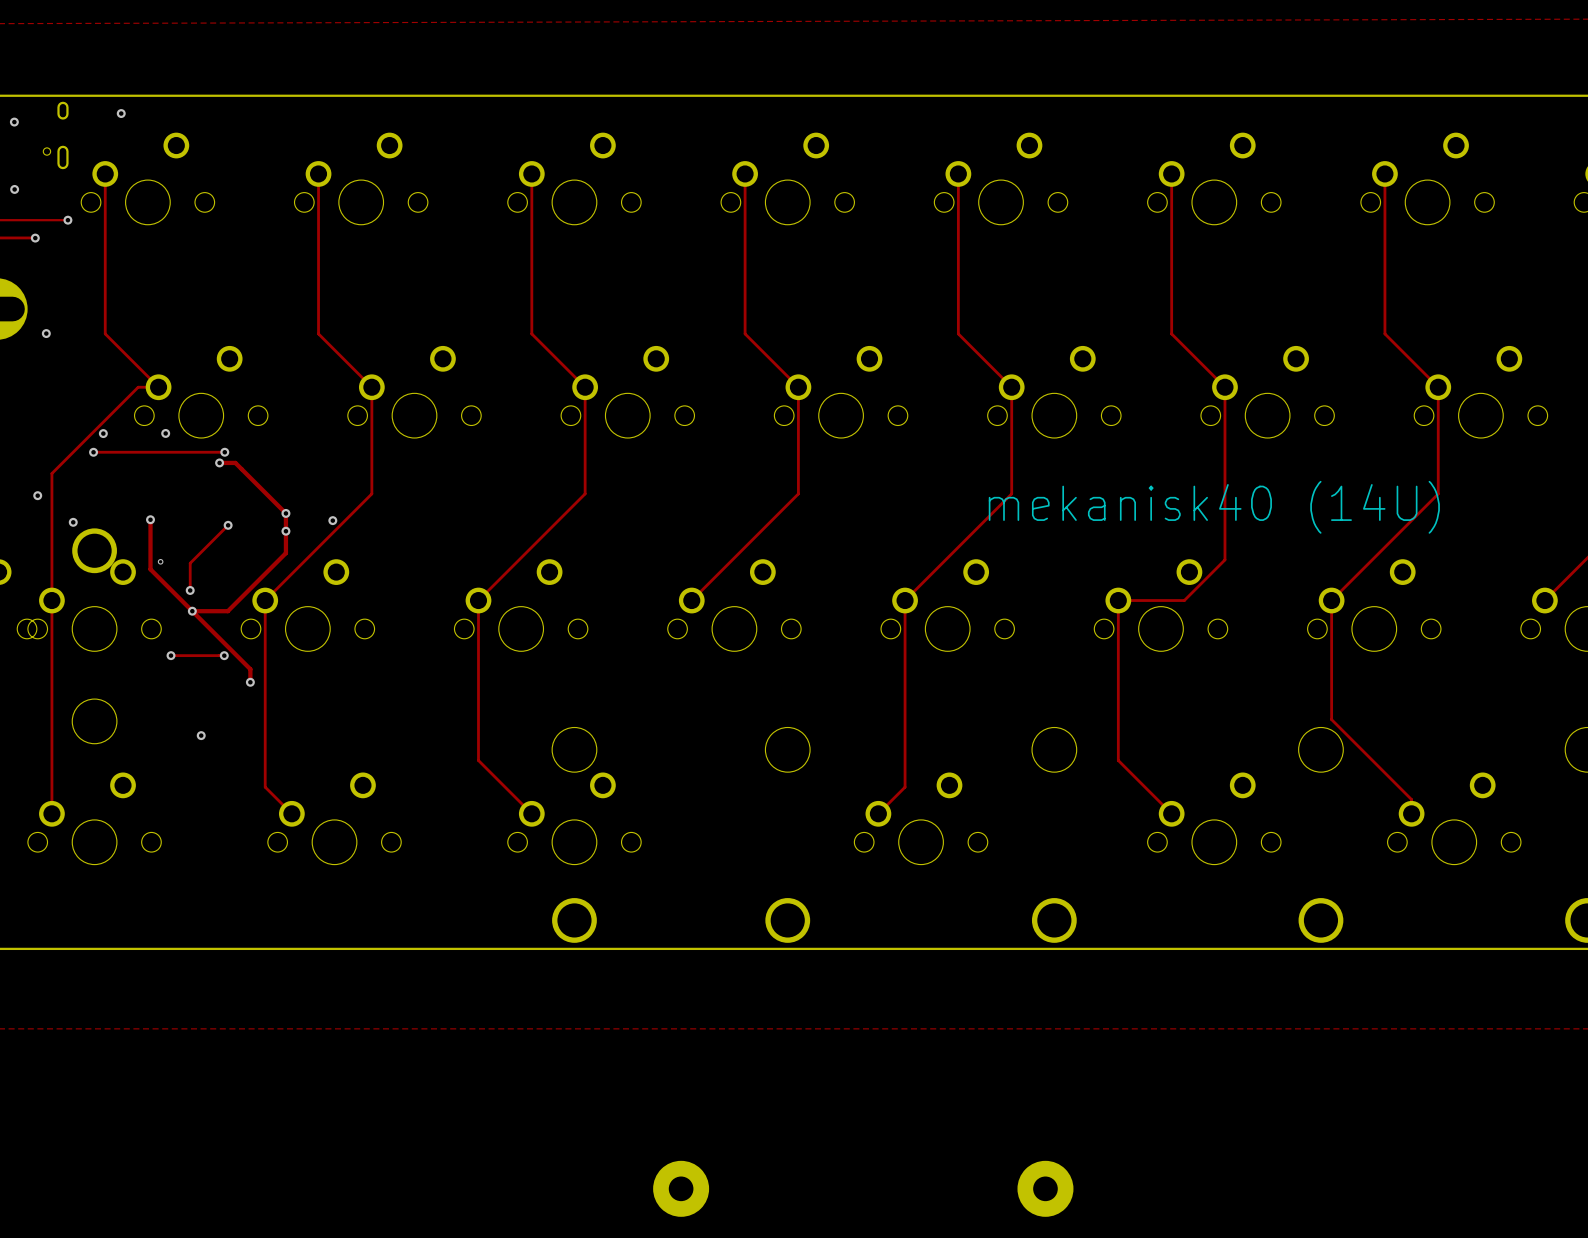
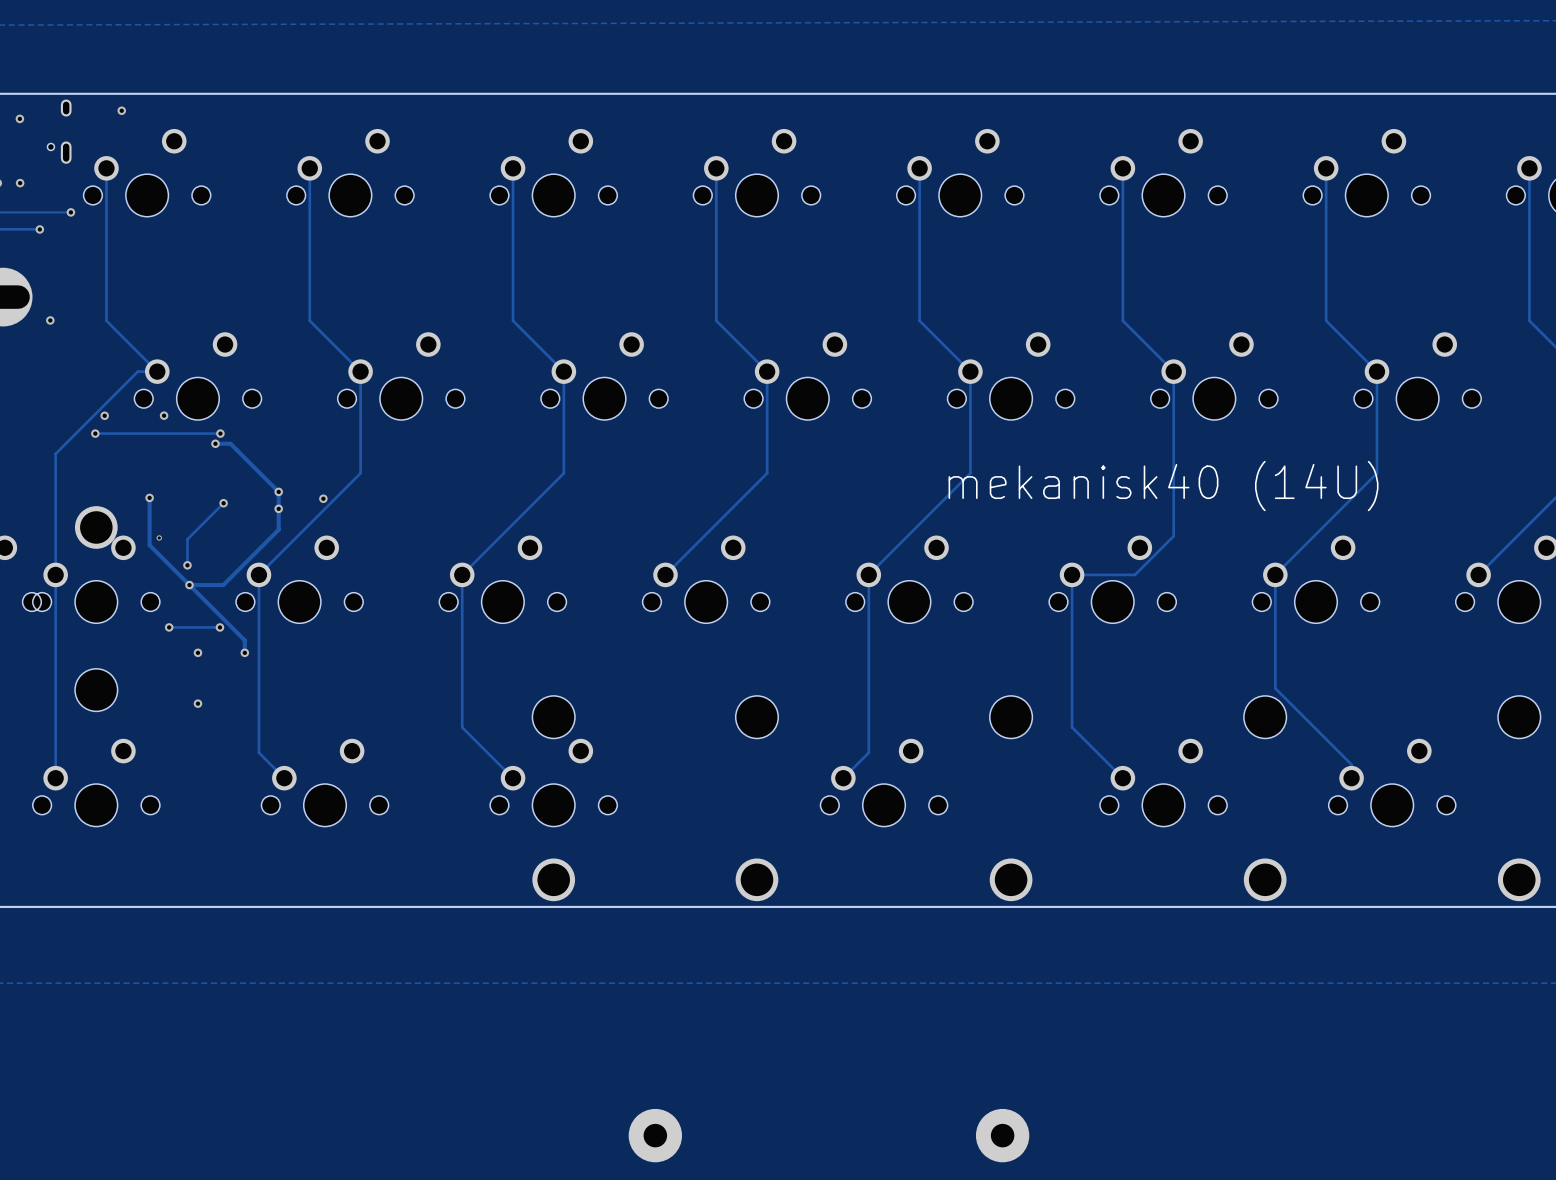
via: (37, 495) -> none
via: (73, 522) -> none
via: none -> (197, 652)

